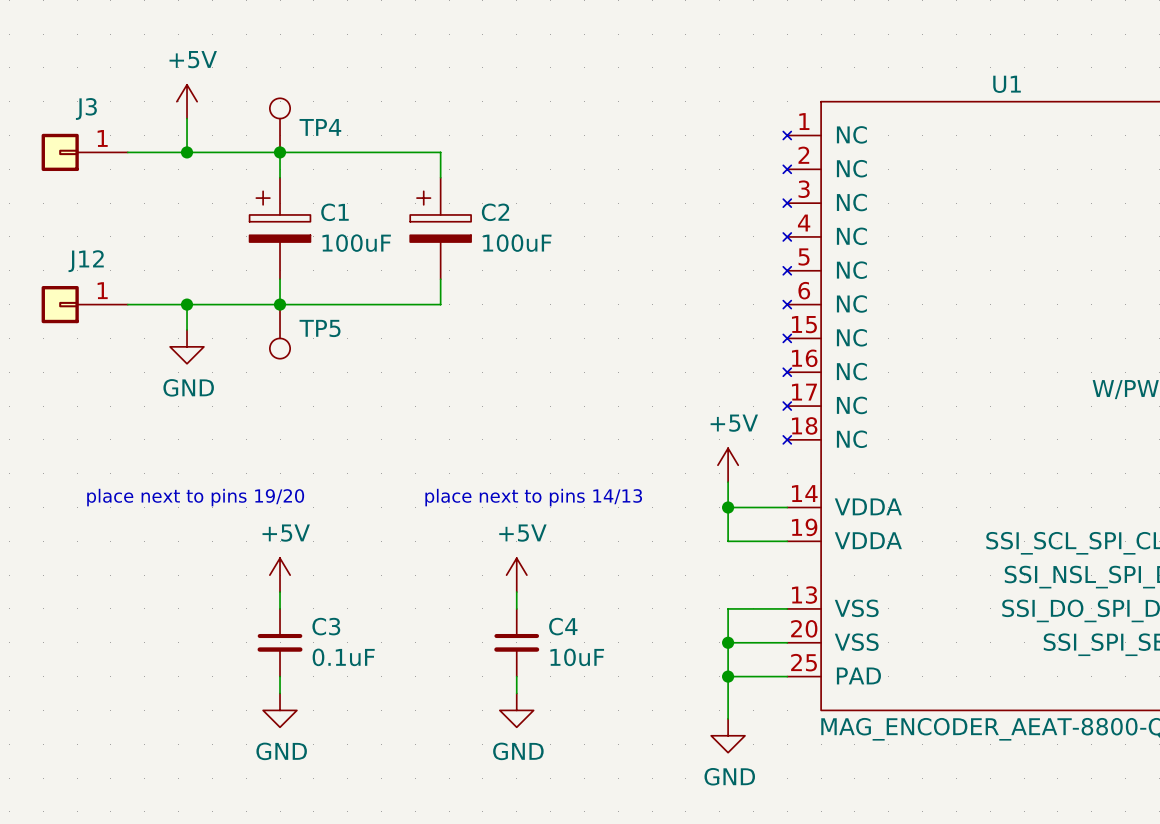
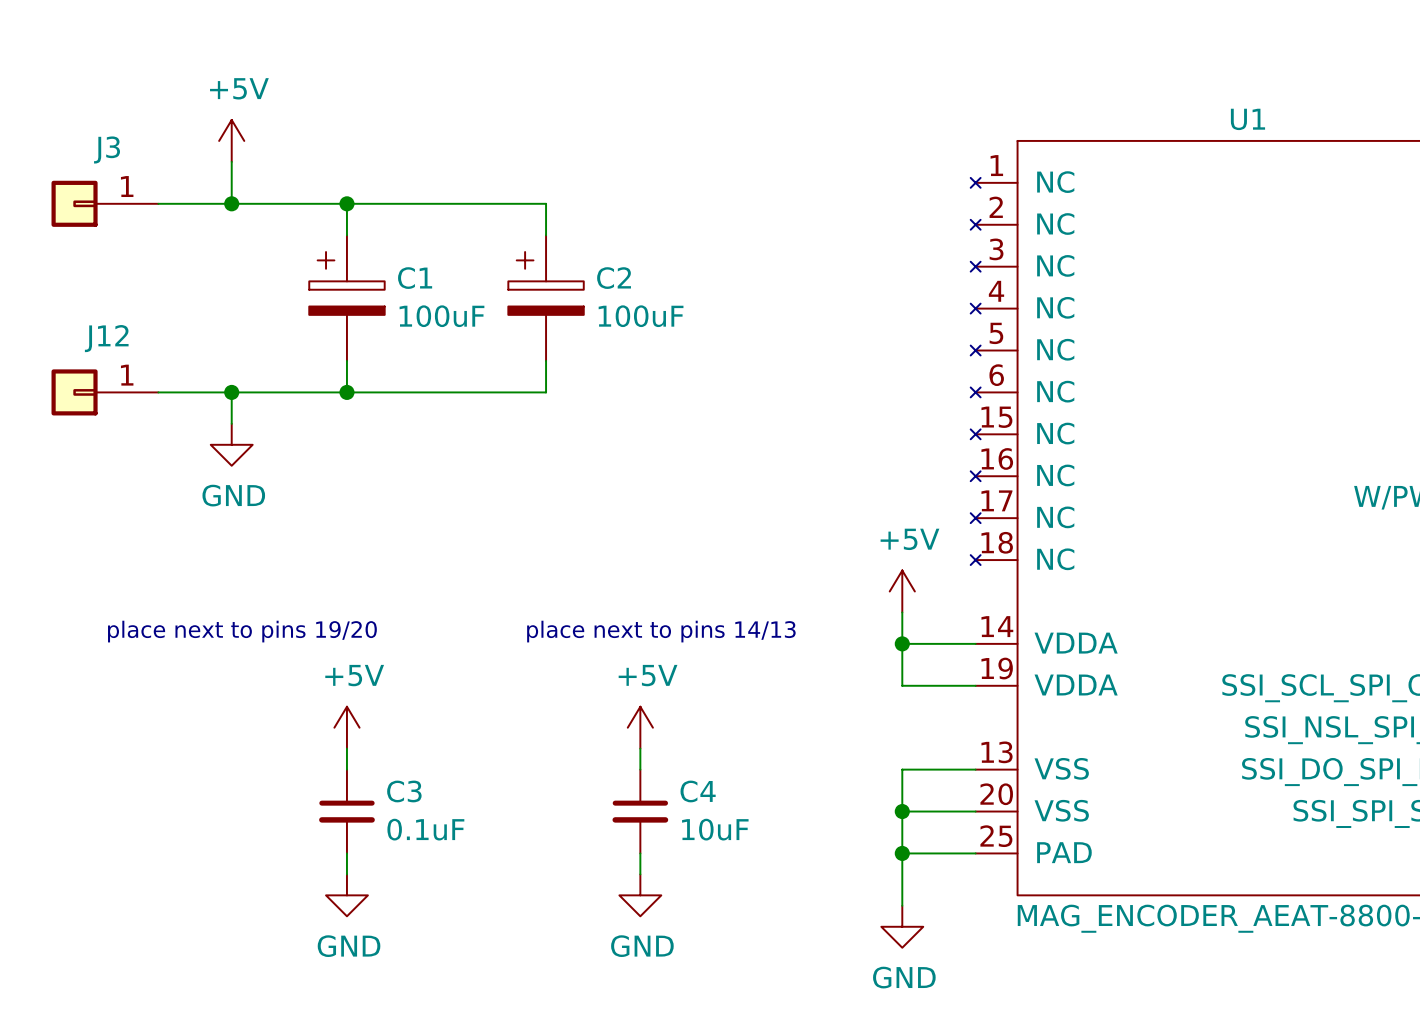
TP4: (280, 125) -> none
TP5: (280, 331) -> none

